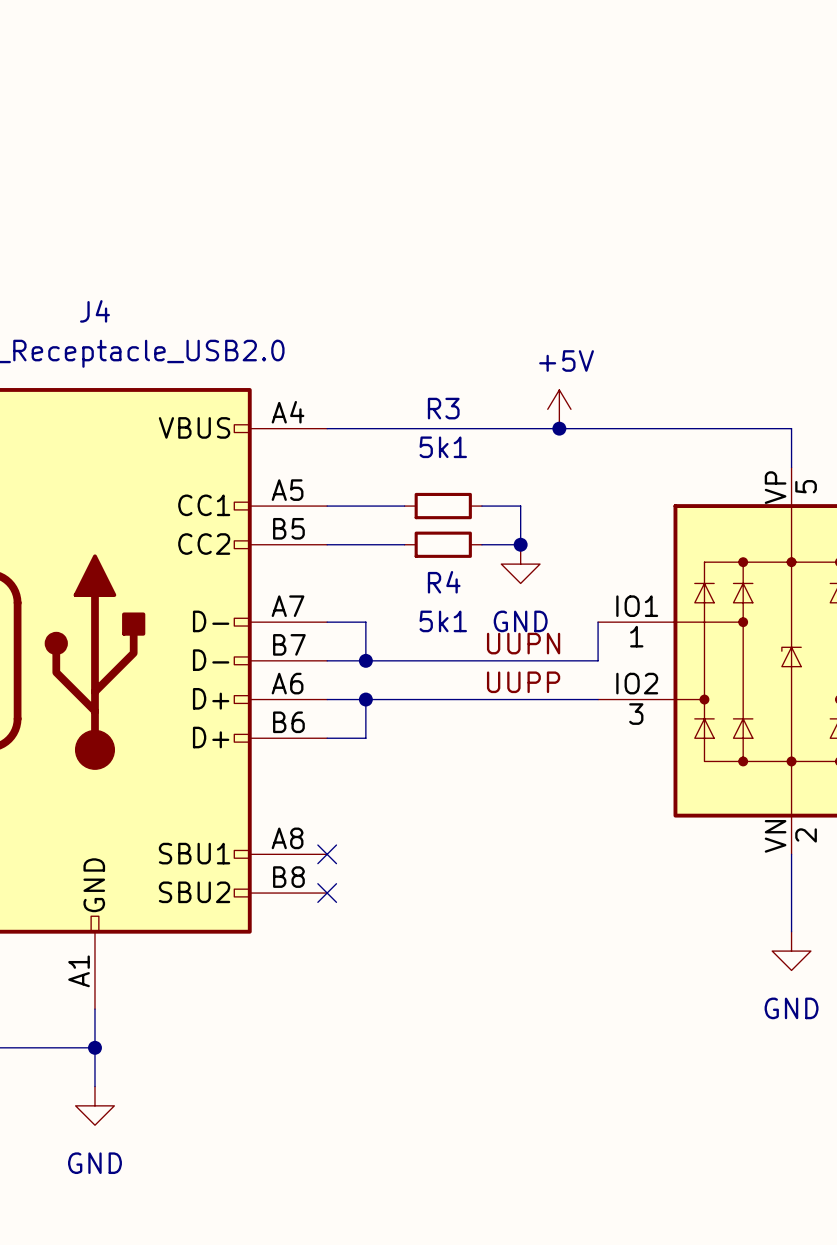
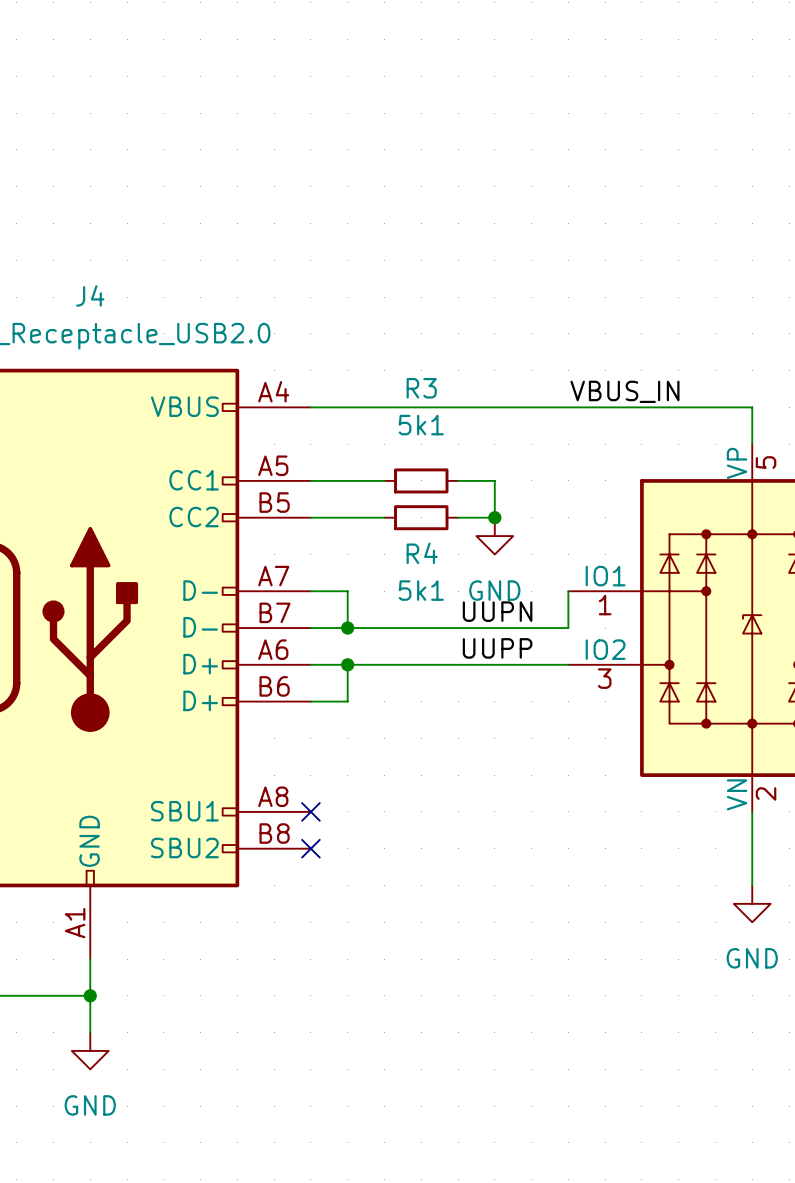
power symbol: +5V (559, 409) -> none
label: none -> VBUS_IN (624, 391)
junction: (559, 428) -> none

